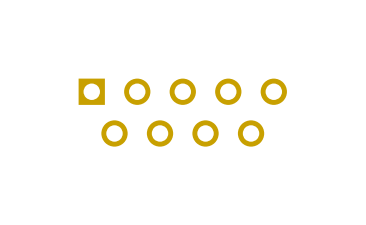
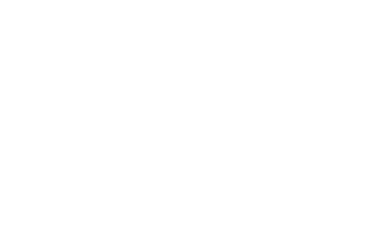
part: (182, 112) -> none

